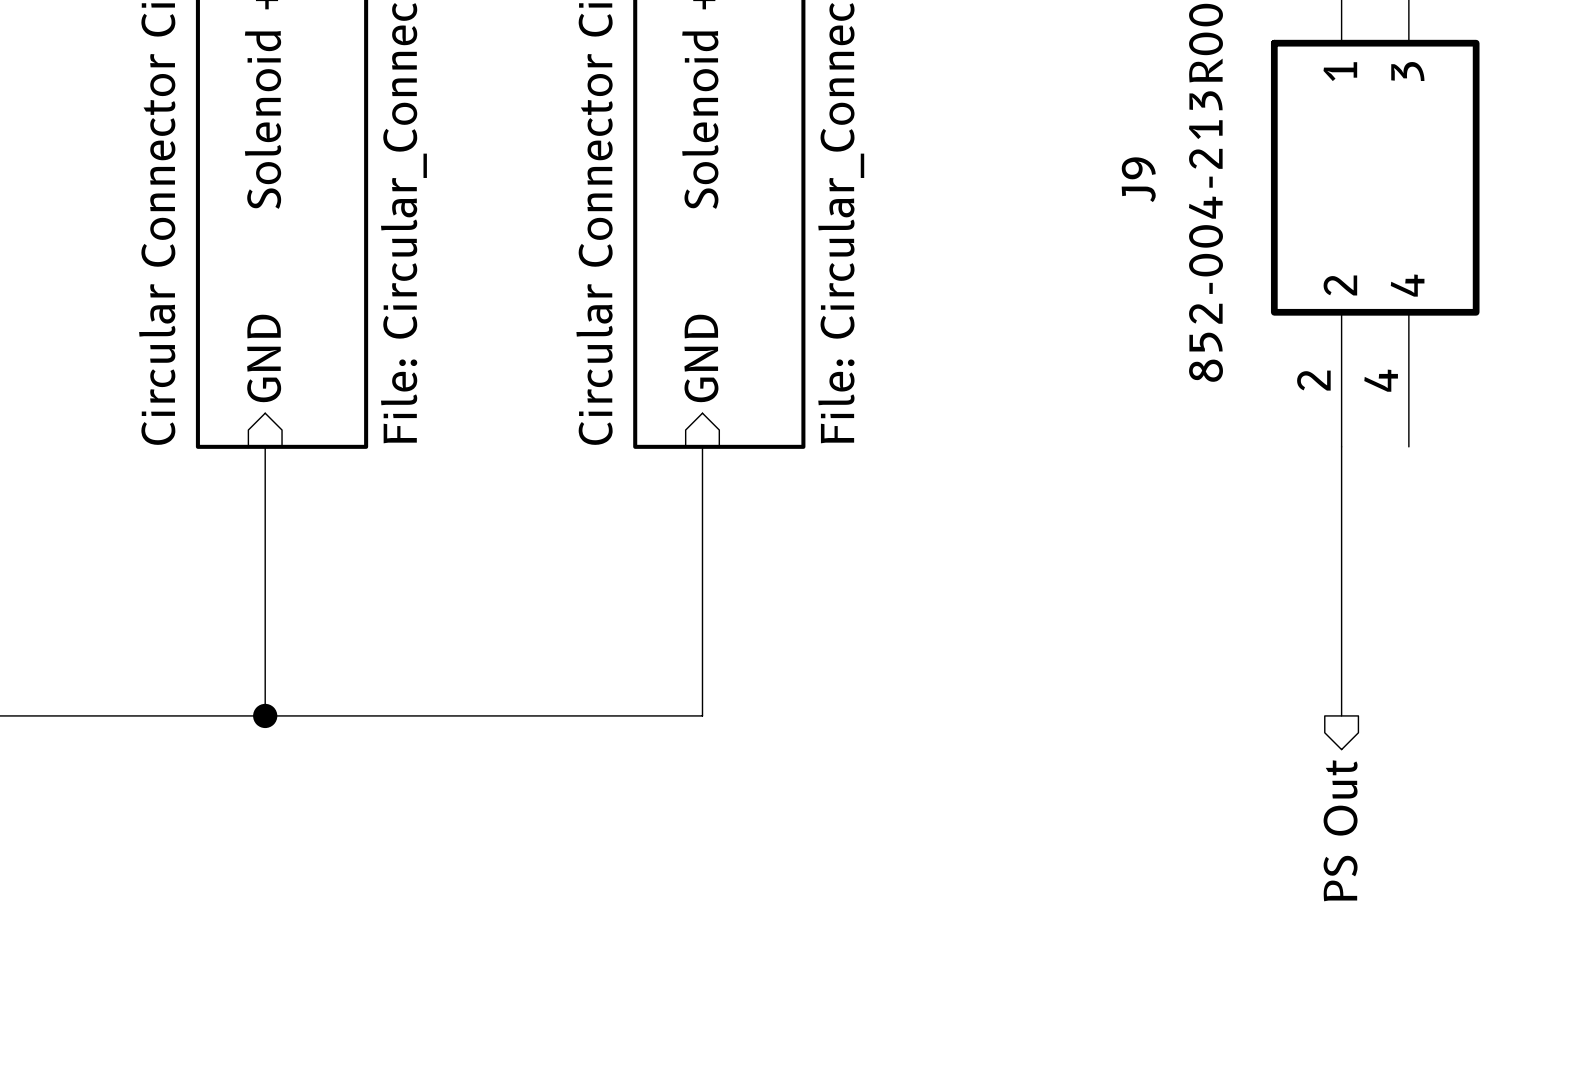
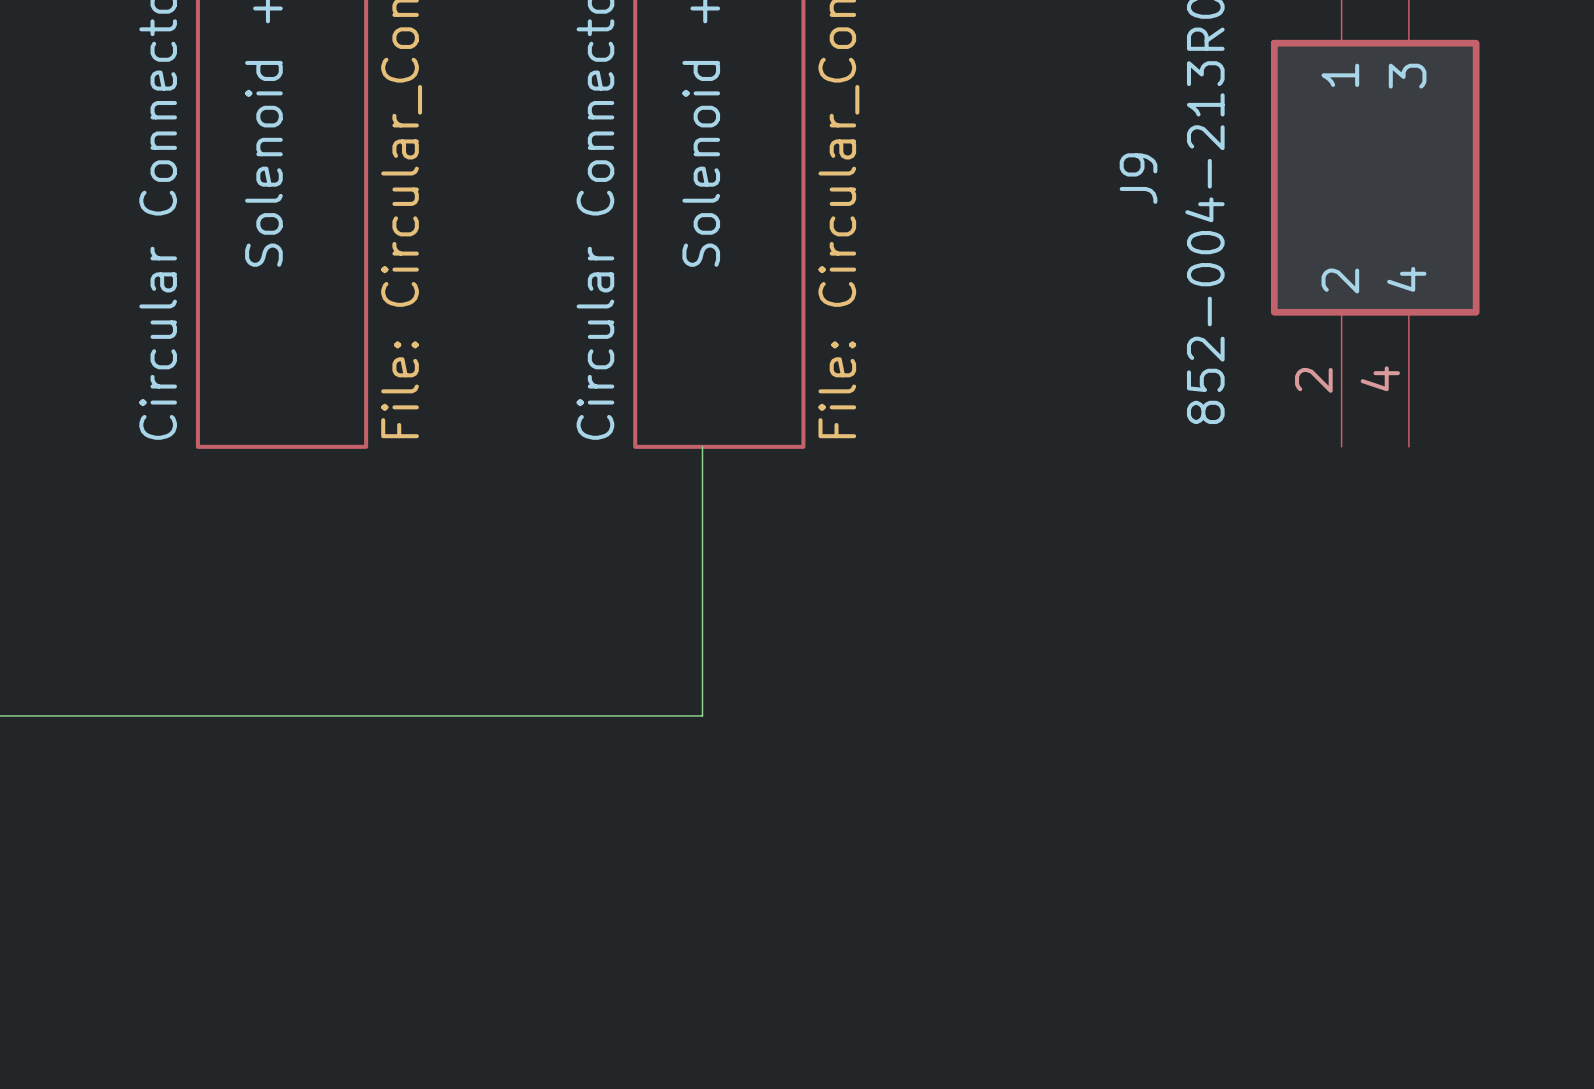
sheet pin: GND (264, 358) -> none
sheet pin: GND (701, 358) -> none
wire: (265, 446) (265, 715) -> none
wire: (1341, 446) (1341, 715) -> none
junction: (265, 715) -> none
hierarchical label: PS Out (1340, 830) -> none

